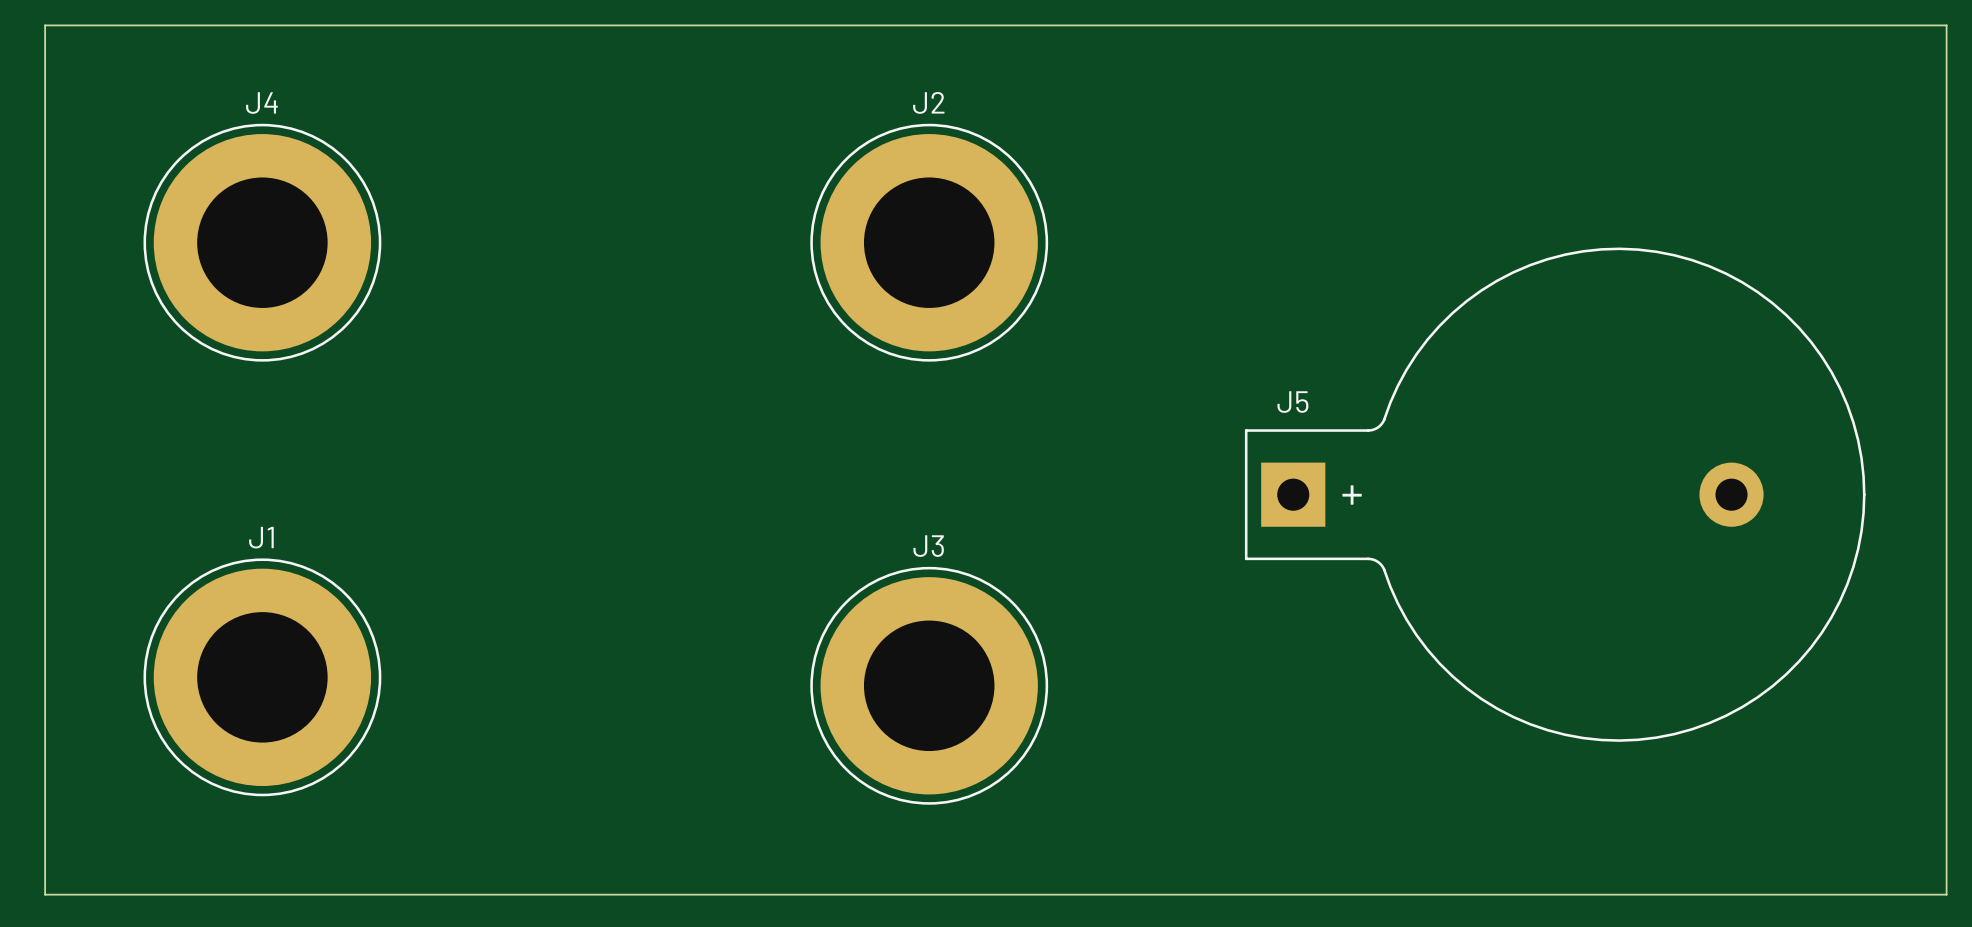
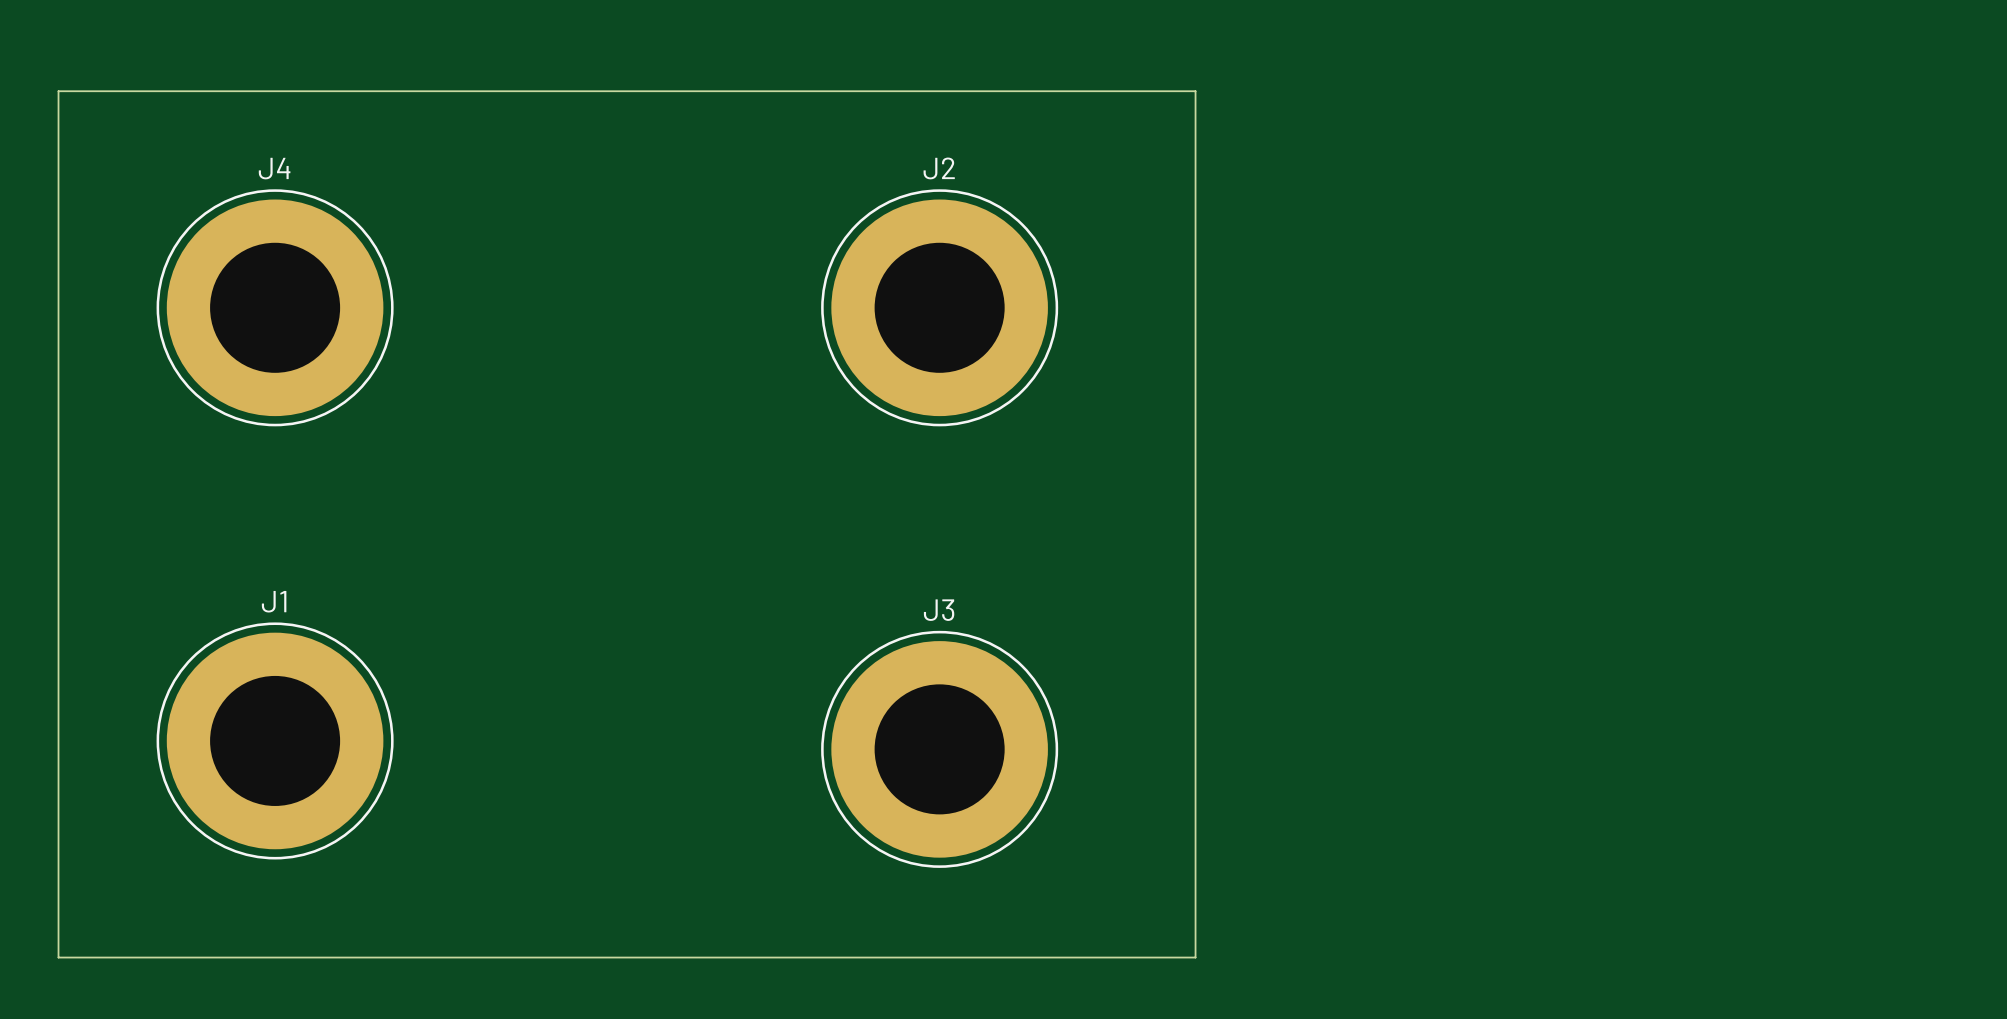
board edge: (1185, 25) (1946, 25) (1946, 894) (1185, 894) -> (1195, 91) (1195, 957)
J5: (1555, 494) -> none

